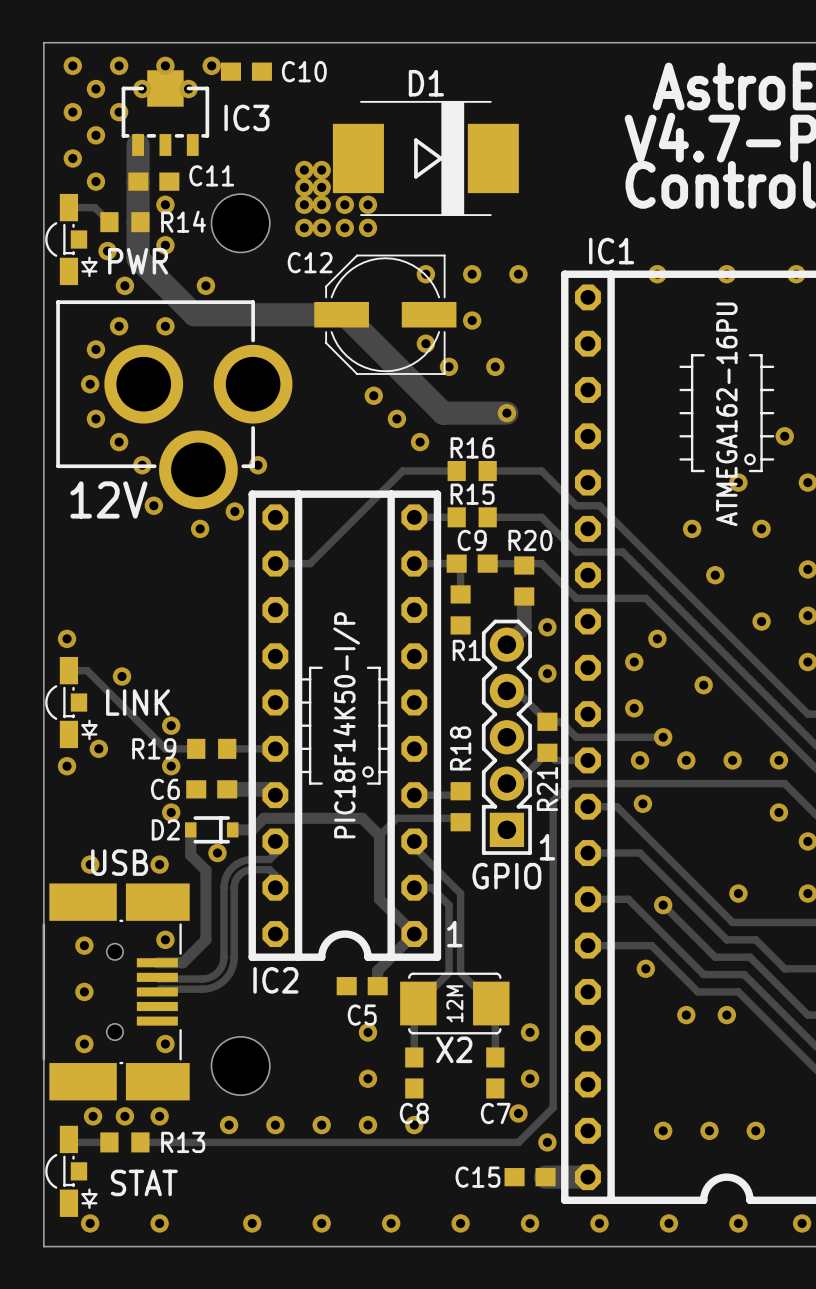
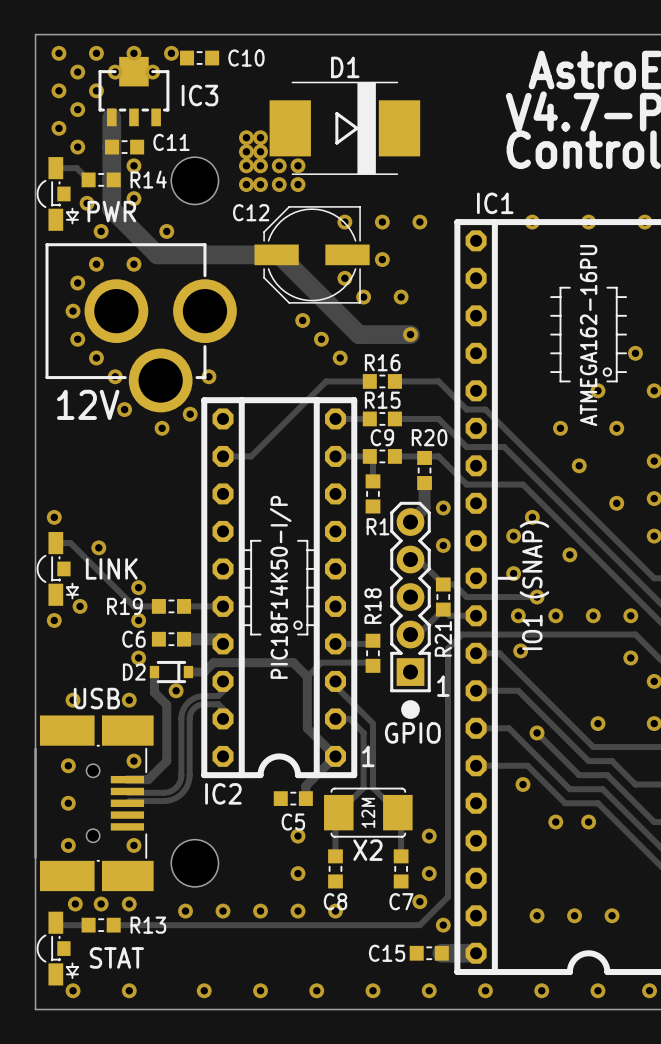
C10 footprint: [220, 62, 272, 81] -> [180, 50, 220, 66]
C11 footprint: [128, 172, 180, 191] -> [105, 139, 145, 155]
R14 footprint: [100, 212, 150, 233] -> [81, 172, 121, 188]
R16 footprint: [447, 460, 497, 482] -> [362, 374, 402, 389]
R15 footprint: [447, 507, 497, 528] -> [362, 411, 402, 427]
C9 footprint: [446, 554, 498, 573] -> [362, 449, 402, 464]
R20 footprint: [514, 556, 535, 606] -> [417, 450, 432, 491]
R1 footprint: [450, 585, 471, 635] -> [365, 474, 381, 514]
GPIO footprint: [481, 619, 532, 855] -> [390, 501, 431, 719]
R21 footprint: [537, 712, 558, 762] -> [435, 577, 451, 617]
line: none -> (494, 578) (515, 578)
text: none -> IO1 (SNAP) (534, 585)
R19 footprint: [187, 738, 237, 759] -> [151, 599, 192, 614]
C6 footprint: [186, 780, 238, 799] -> [151, 631, 192, 647]
R18 footprint: [450, 782, 471, 832] -> [365, 633, 381, 673]
C5 footprint: [336, 977, 388, 996] -> [273, 791, 313, 806]
C8 footprint: [405, 1047, 424, 1099] -> [328, 849, 343, 889]
C7 footprint: [486, 1047, 505, 1099] -> [393, 849, 409, 889]
R13 footprint: [100, 1132, 150, 1153] -> [81, 917, 121, 933]
C15 footprint: [504, 1168, 556, 1187] -> [409, 945, 449, 961]

